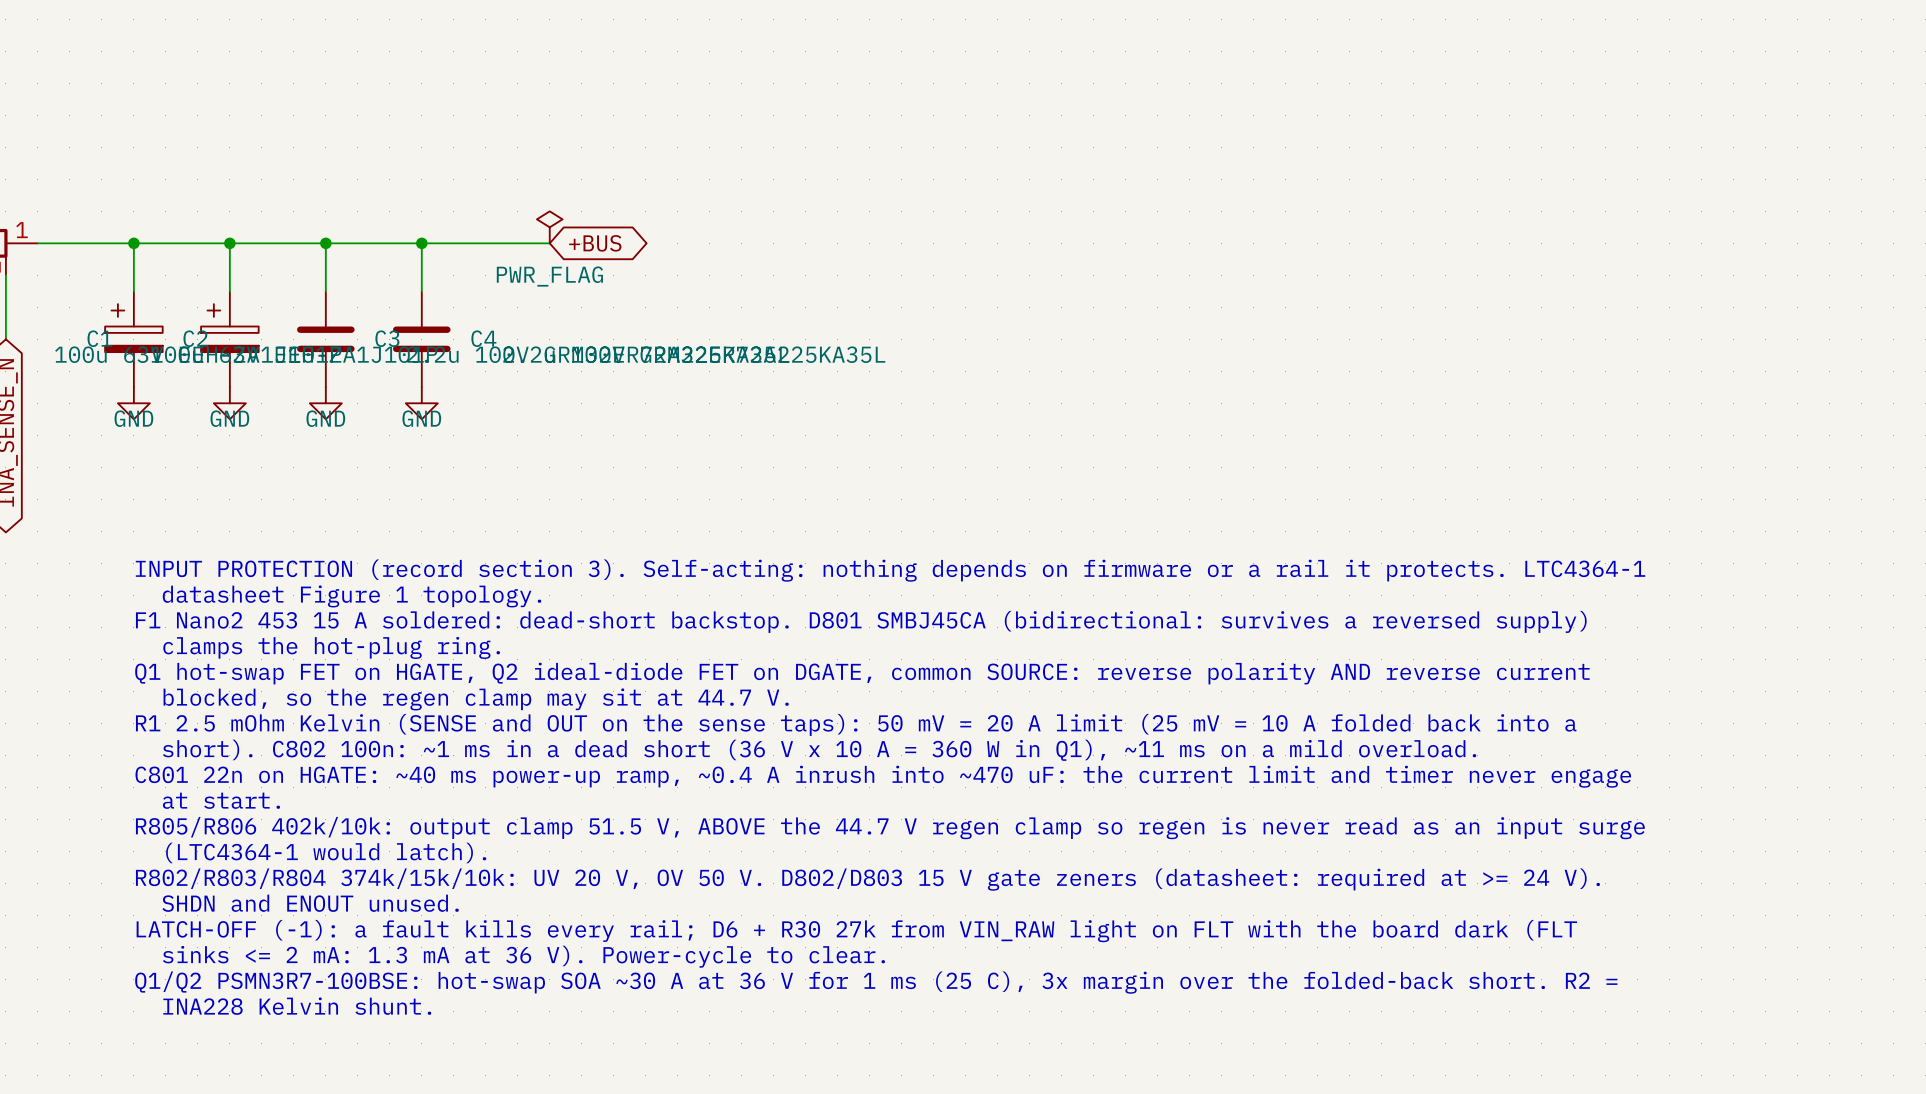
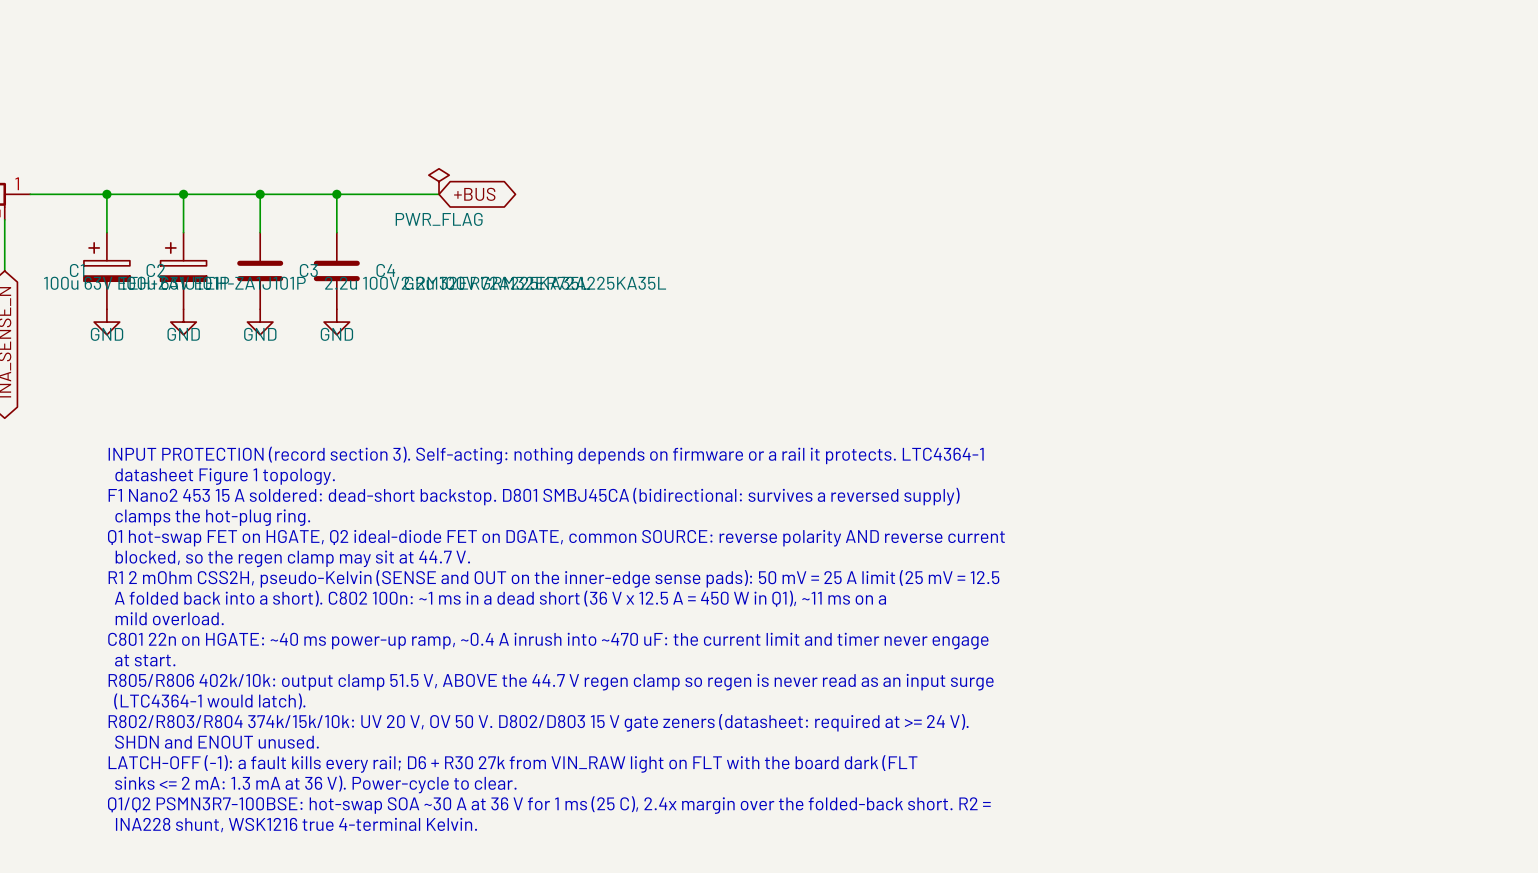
text: R1 2.5 mOhm Kelvin (SENSE and OUT on the sense taps): 50 mV = 20 A limit (25 mV = 10 A folded back into a (856, 724) -> R1 2 mOhm CSS2H, pseudo-Kelvin (SENSE and OUT on the inner-edge sense pads): 50 mV = 25 A limit (25 mV = 12.5 (553, 578)
text: short). C802 100n: ~1 ms in a dead short (36 V x 10 A = 360 W in Q1), ~11 ms on a mild overload. (819, 750) -> A folded back into a short). C802 100n: ~1 ms in a dead short (36 V x 12.5 A = 450 W in Q1), ~11 ms on a (500, 598)
text: C801 22n on HGATE: ~40 ms power-up ramp, ~0.4 A inrush into ~470 uF: the current limit and timer never engage (883, 776) -> mild overload. (169, 618)
text: at start. (221, 800) -> C801 22n on HGATE: ~40 ms power-up ramp, ~0.4 A inrush into ~470 uF: the current limit and timer never engage (548, 641)
text: R805/R806 402k/10k: output clamp 51.5 V, ABOVE the 44.7 V regen clamp so regen is never read as an input surge (890, 828) -> at start. (145, 660)
text: (LTC4364-1 would latch). (326, 852) -> R805/R806 402k/10k: output clamp 51.5 V, ABOVE the 44.7 V regen clamp so regen is never read as an input surge (551, 682)
text: R802/R803/R804 374k/15k/10k: UV 20 V, OV 50 V. D802/D803 15 V gate zeners (datasheet: required at >= 24 V). (867, 879) -> (LTC4364-1 would latch). (209, 701)
text: SHDN and ENOUT unused. (310, 903) -> R802/R803/R804 374k/15k/10k: UV 20 V, OV 50 V. D802/D803 15 V gate zeners (datasheet: required at >= 24 V). (538, 722)
text: LATCH-OFF (-1): a fault kills every rail; D6 + R30 27k from VIN_RAW light on FLT with the board dark (FLT (856, 931) -> SHDN and ENOUT unused. (216, 742)
text: sinks <= 2 mA: 1.3 mA at 36 V). Power-cycle to clear. (523, 956) -> LATCH-OFF (-1): a fault kills every rail; D6 + R30 27k from VIN_RAW light on FLT with the board dark (FLT (513, 763)
text: Q1/Q2 PSMN3R7-100BSE: hot-swap SOA ~30 A at 36 V for 1 ms (25 C), 3x margin over the folded-back short. R2 = (876, 982) -> sinks <= 2 mA: 1.3 mA at 36 V). Power-cycle to clear. (315, 784)
text: INA228 Kelvin shunt. (297, 1006) -> Q1/Q2 PSMN3R7-100BSE: hot-swap SOA ~30 A at 36 V for 1 ms (25 C), 2.4x margin over the folded-back short. R2 = (549, 805)
text: none -> INA228 shunt, WSK1216 true 4-terminal Kelvin. (296, 825)

